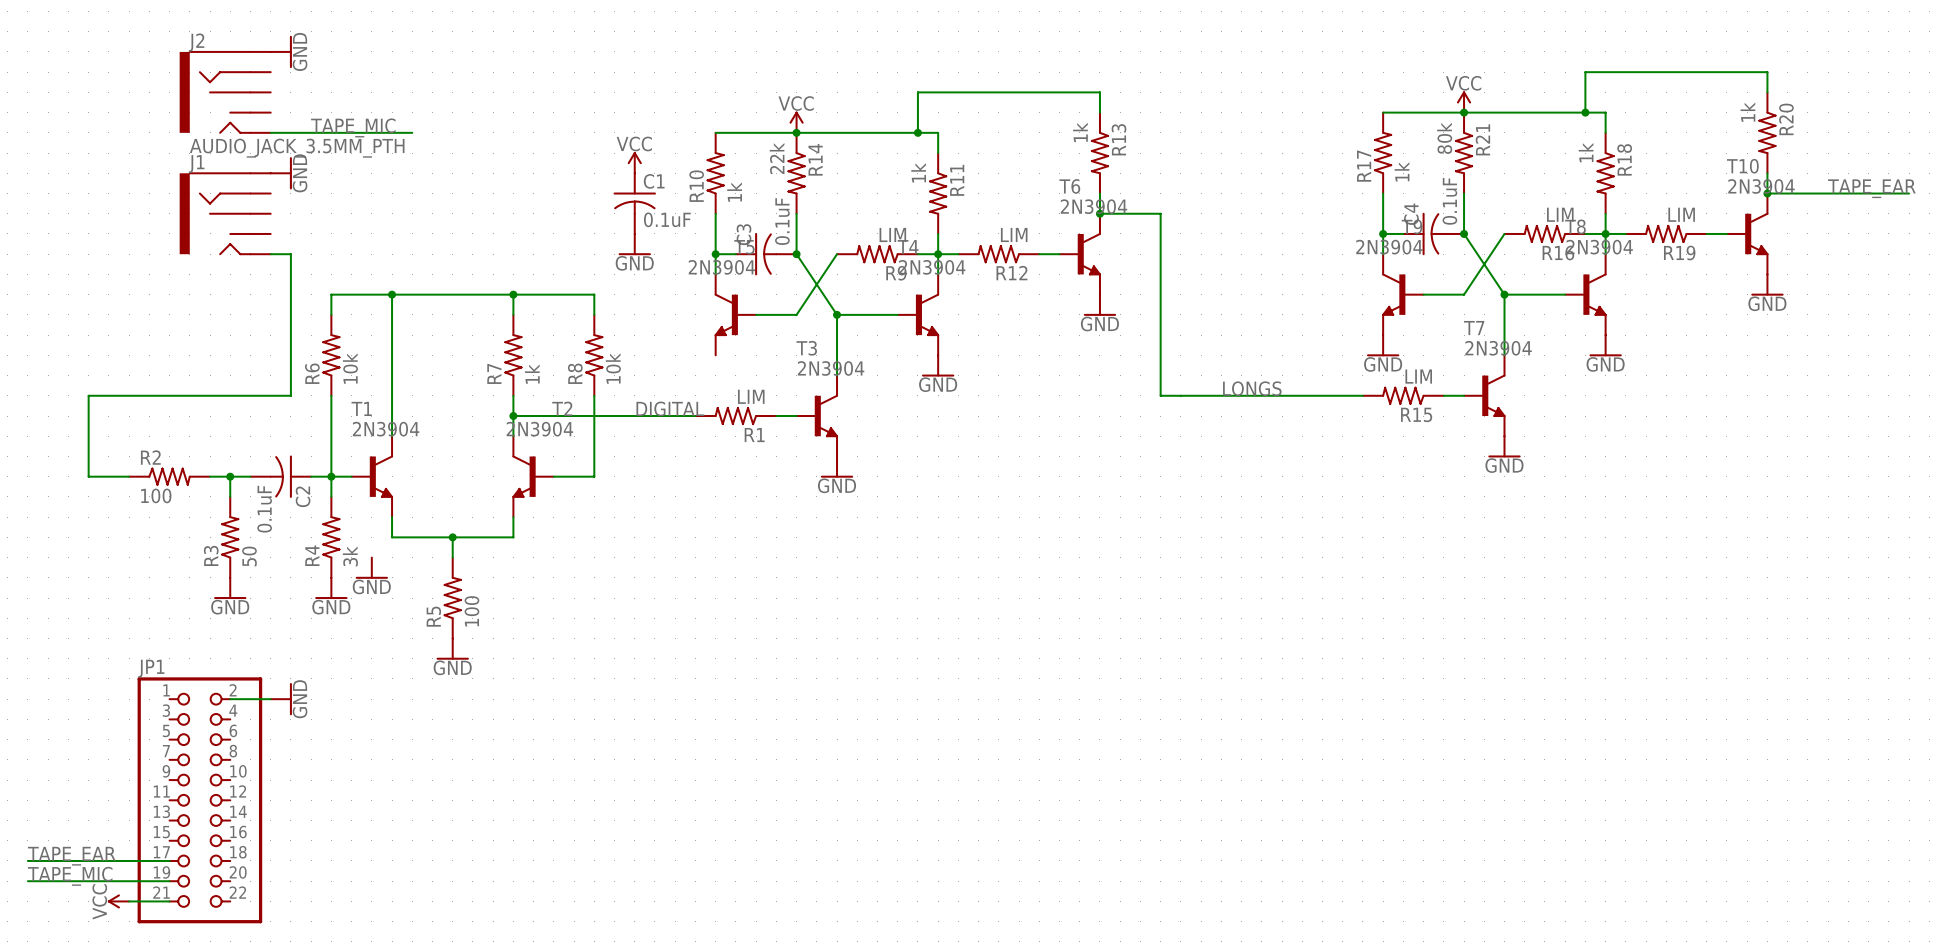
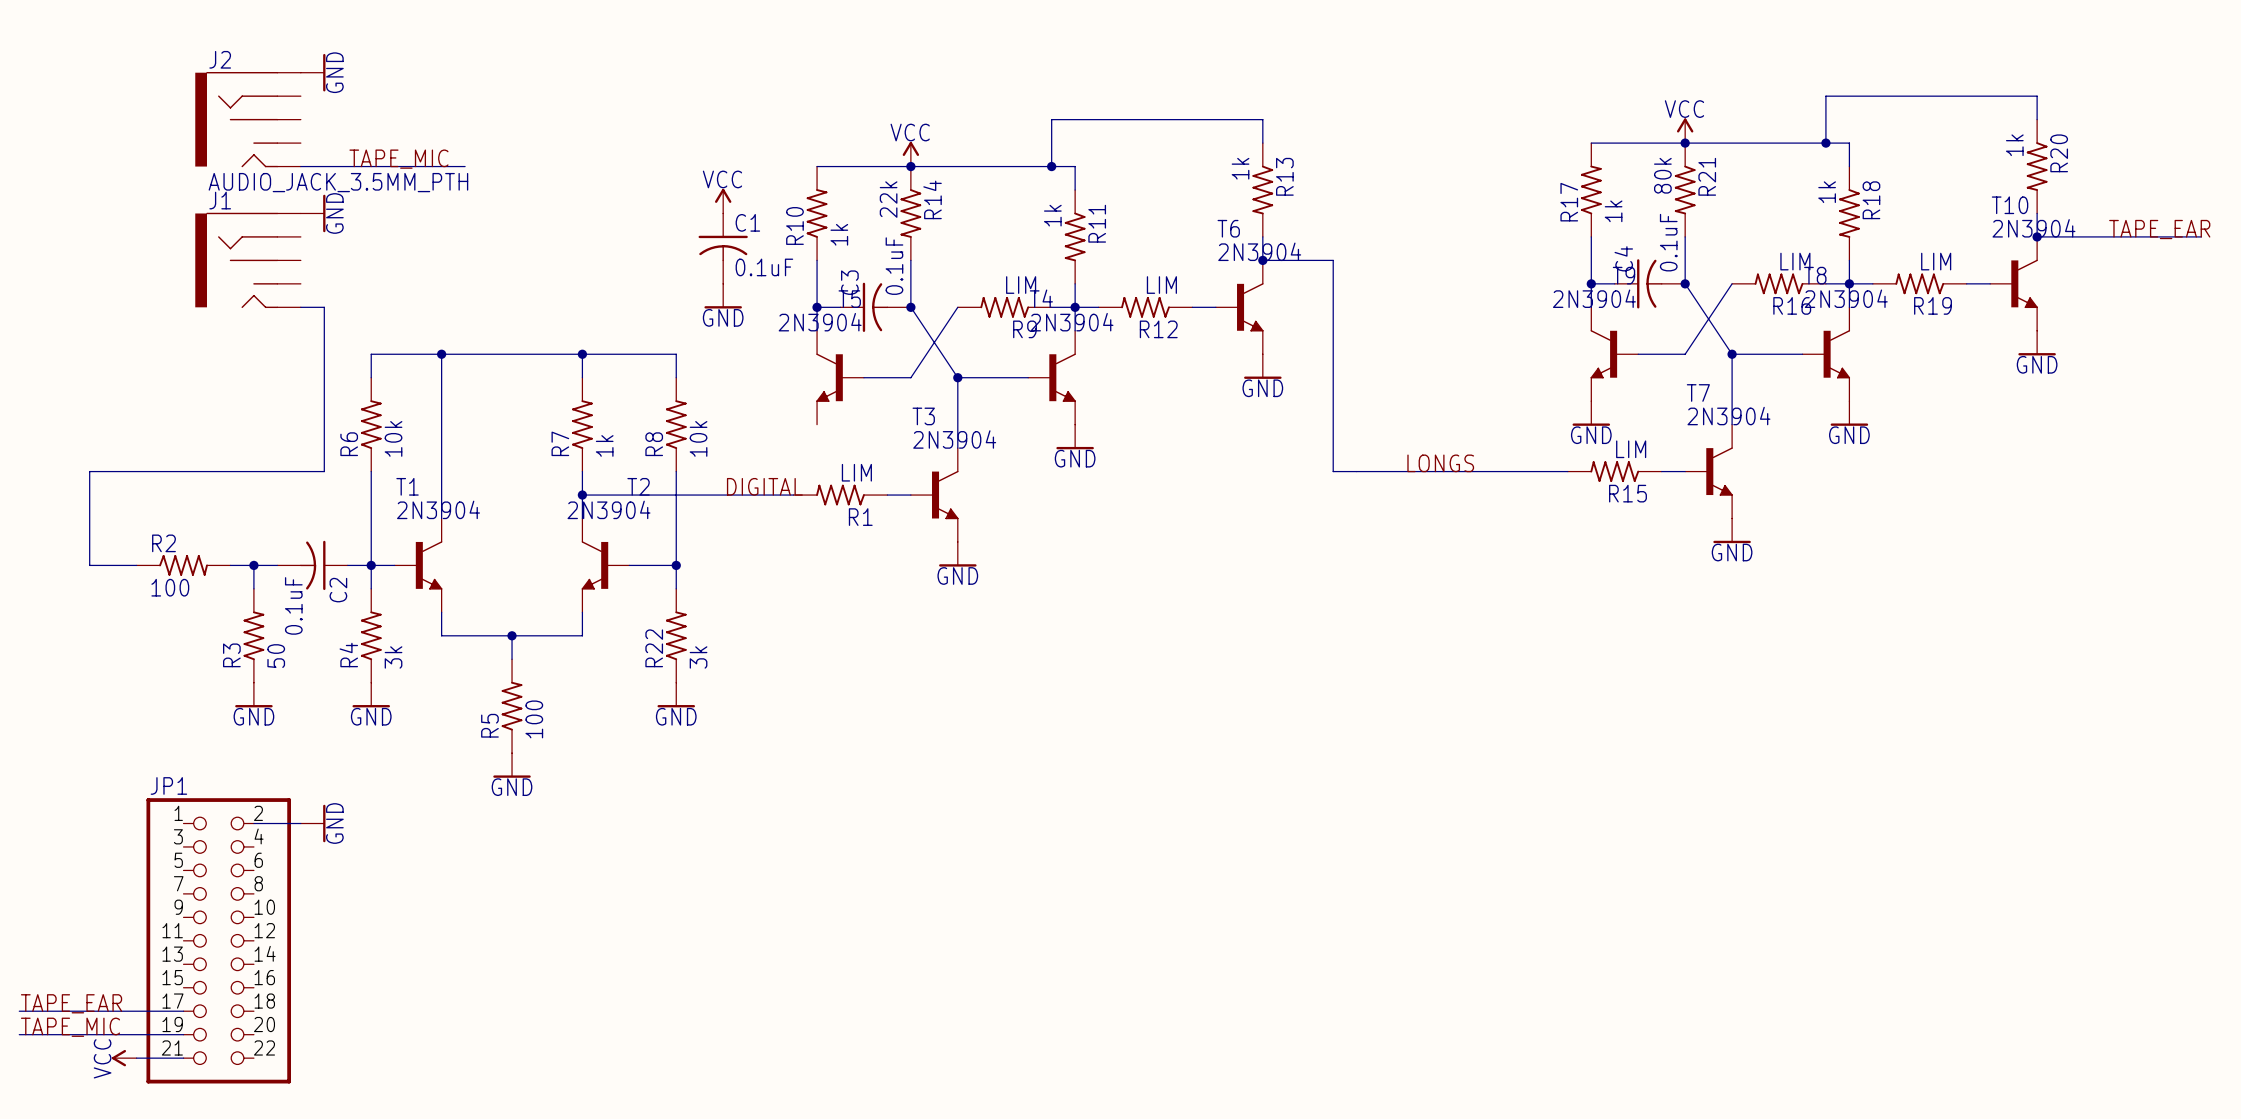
wire: none -> (676, 565) (676, 588)
junction: none -> (676, 565)
R22: none -> 3k (676, 635)
power symbol: GND (371, 568) -> none
power symbol: none -> GND (676, 695)

